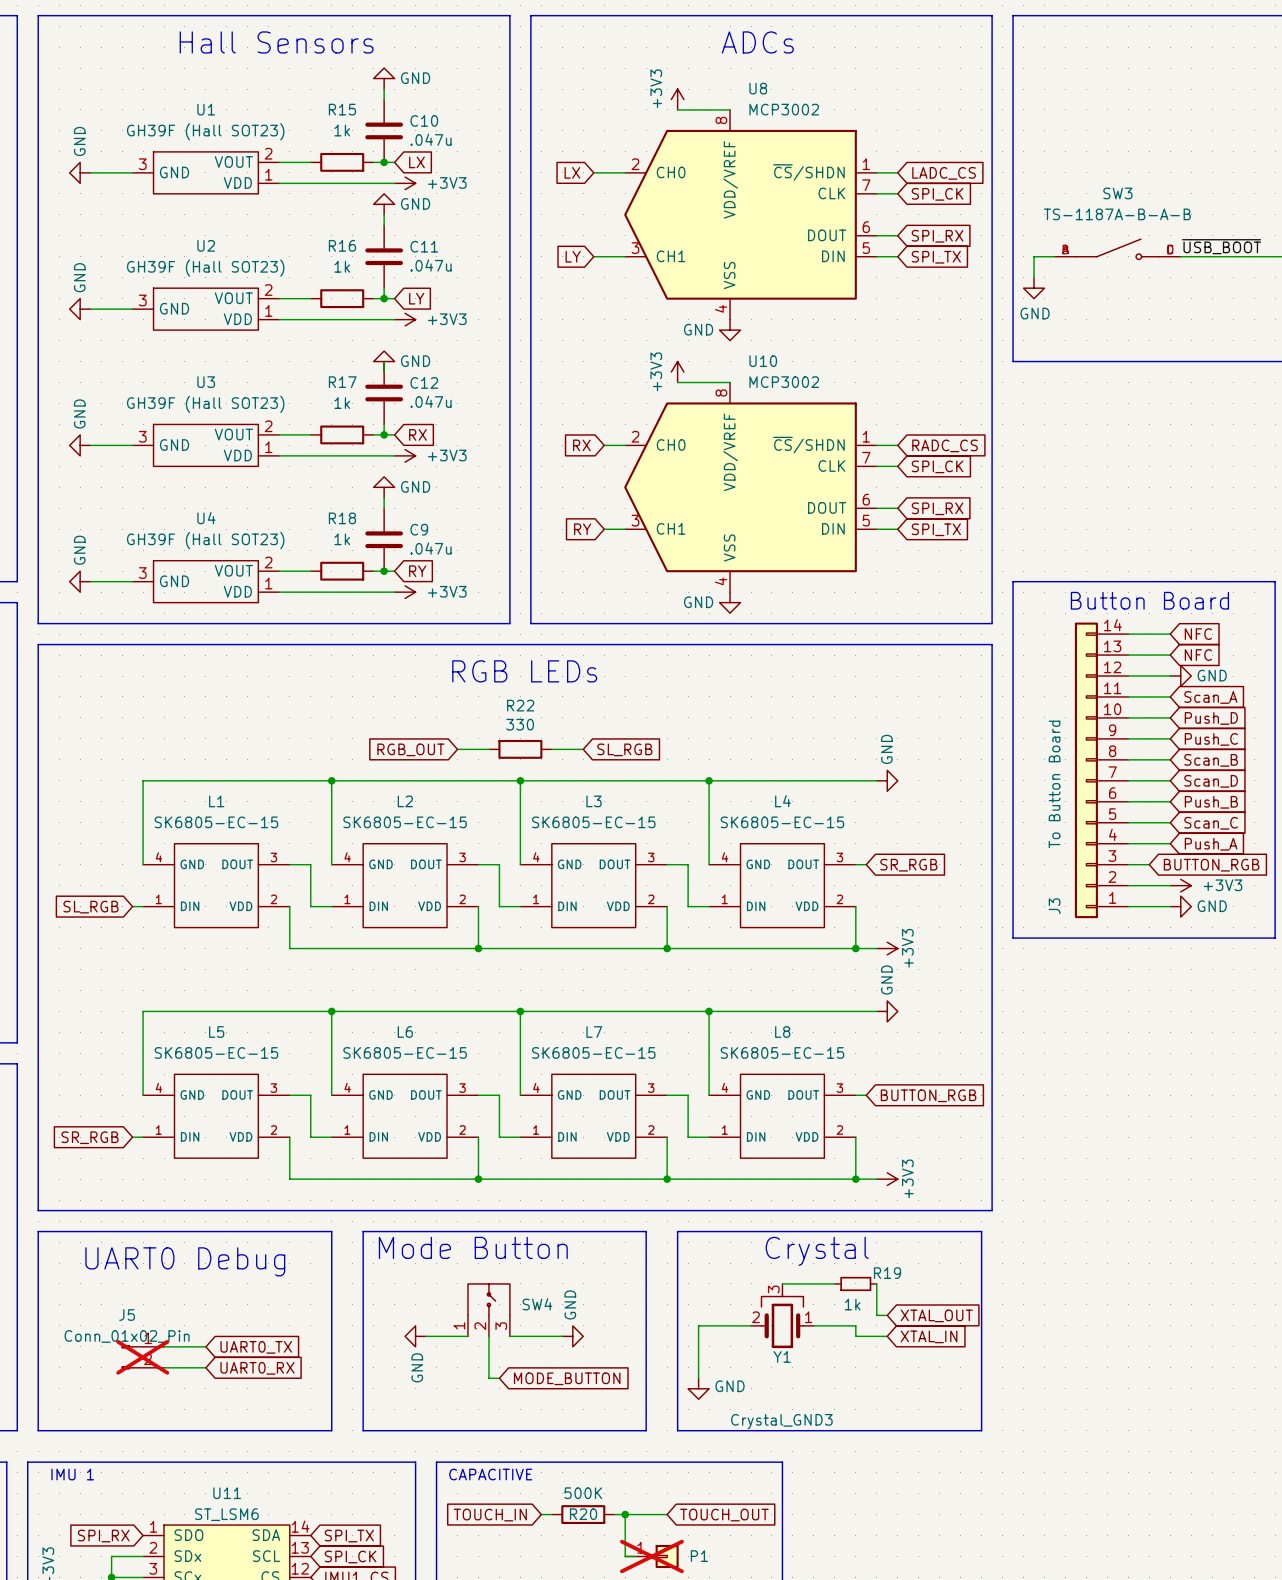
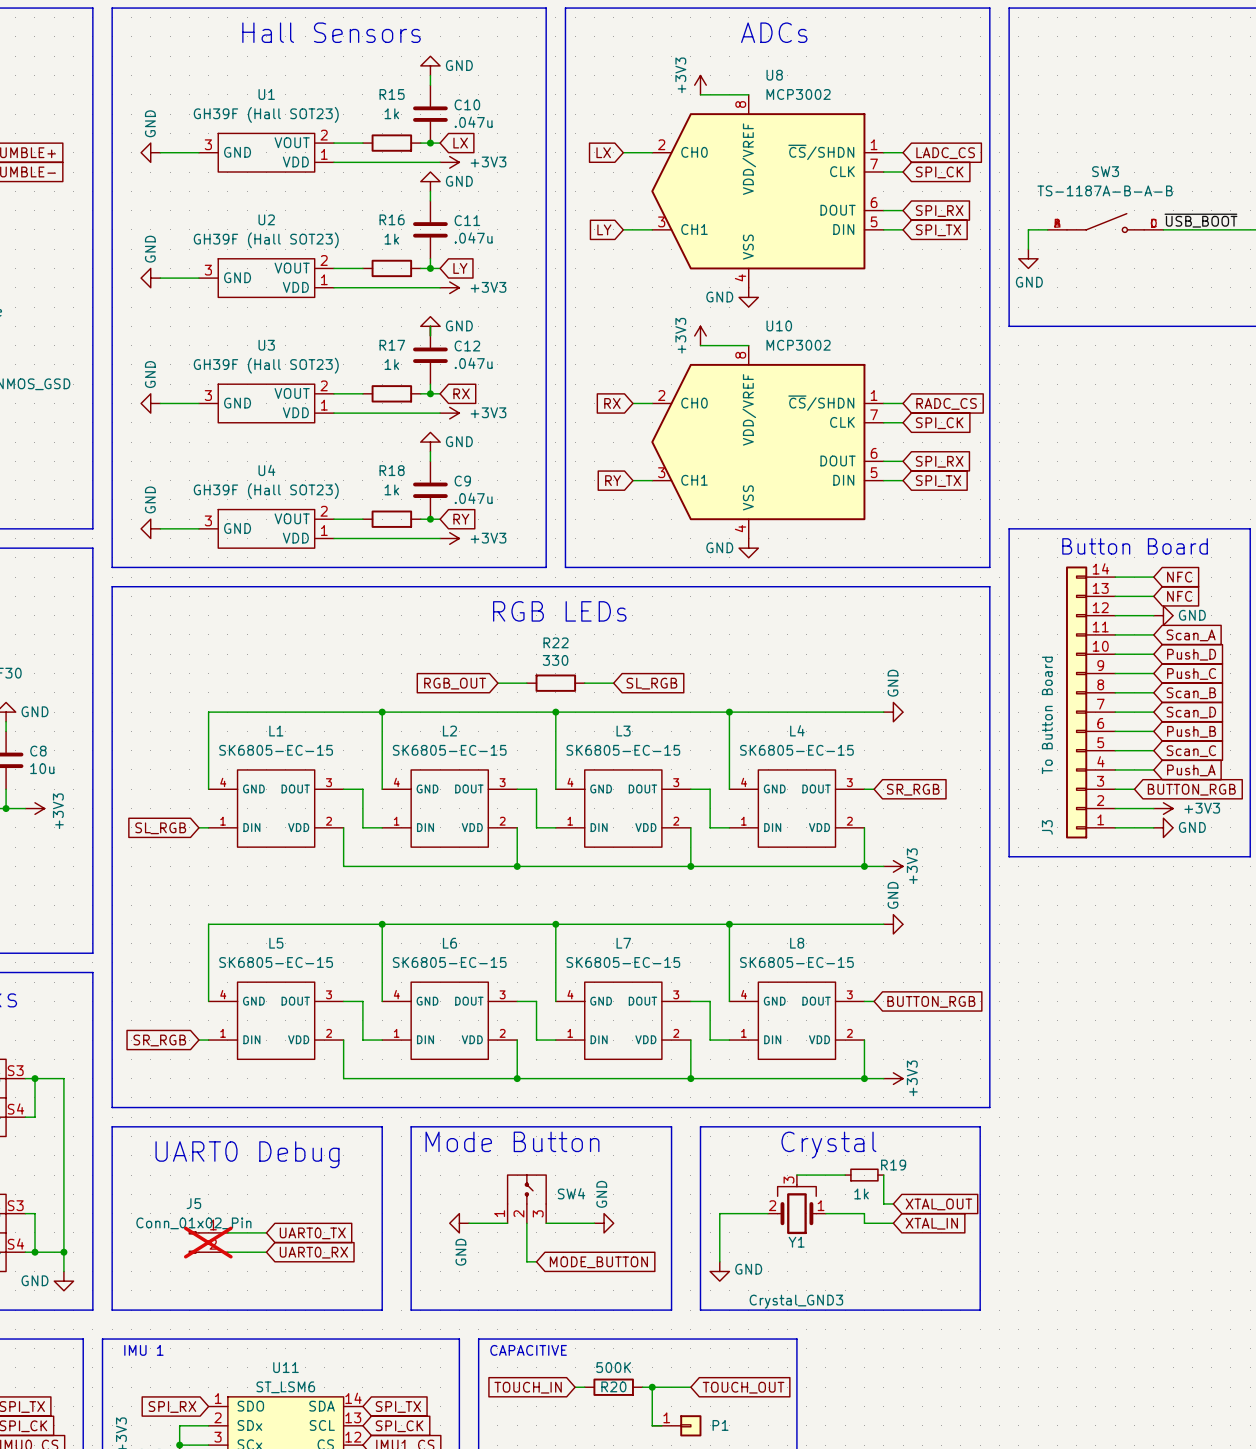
P1 do-not-place cross: (651, 1556) -> none

